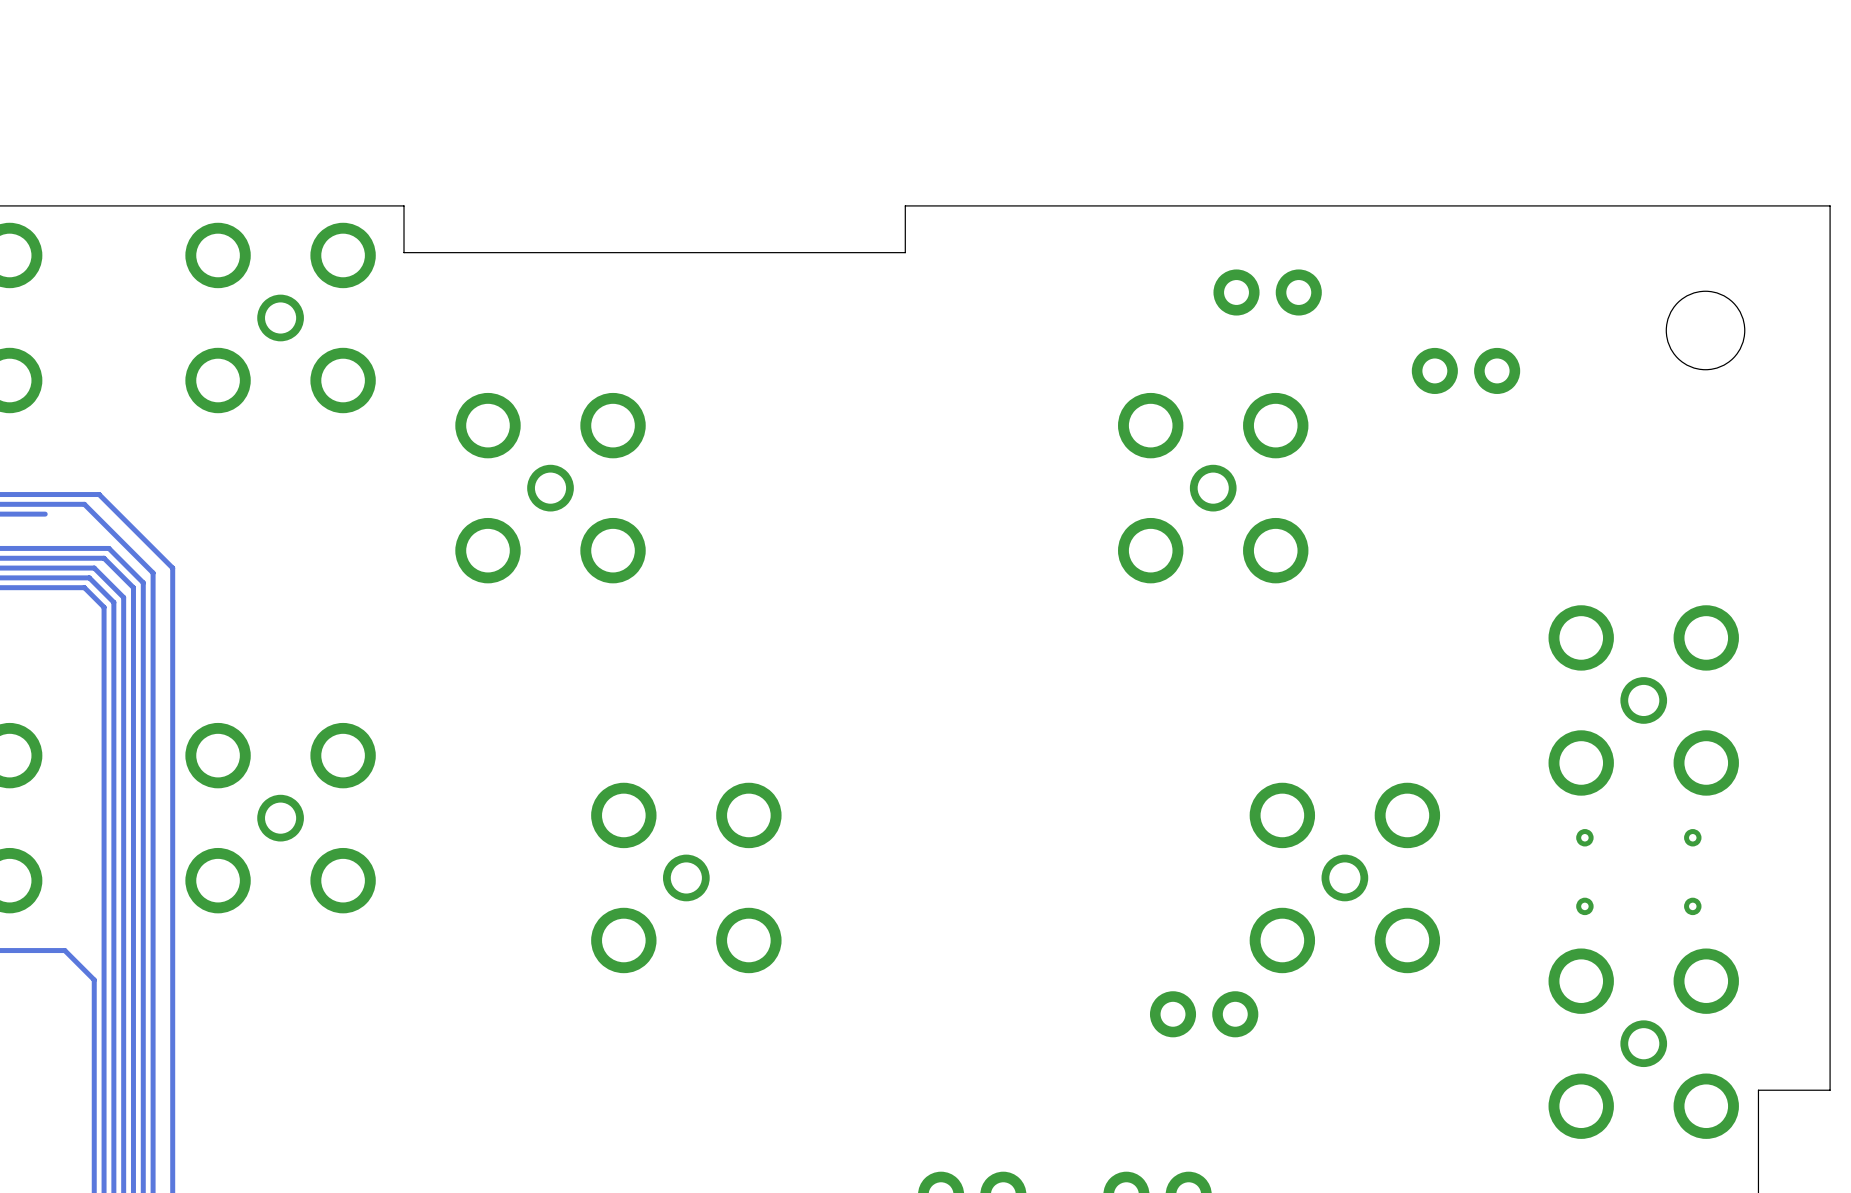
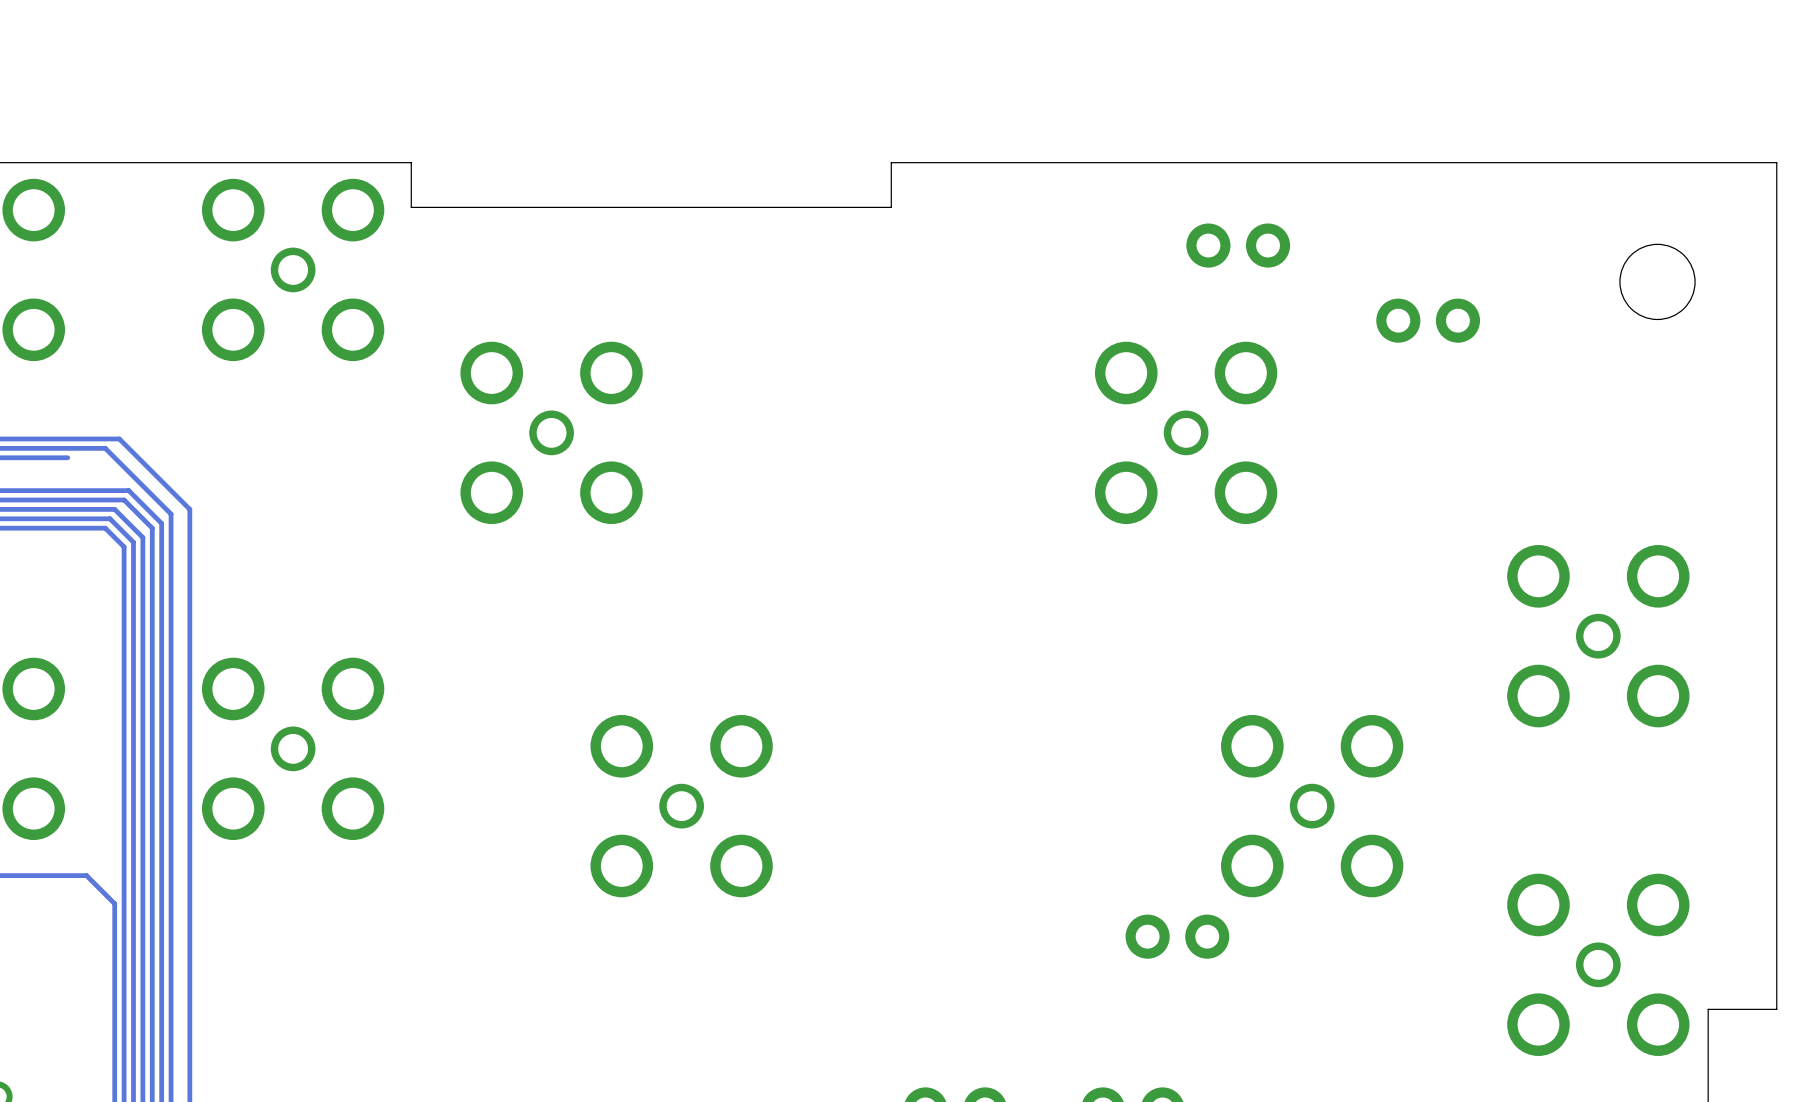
via: (1584, 837) -> none
via: (1692, 837) -> none
via: (1584, 906) -> none
via: (1692, 906) -> none

